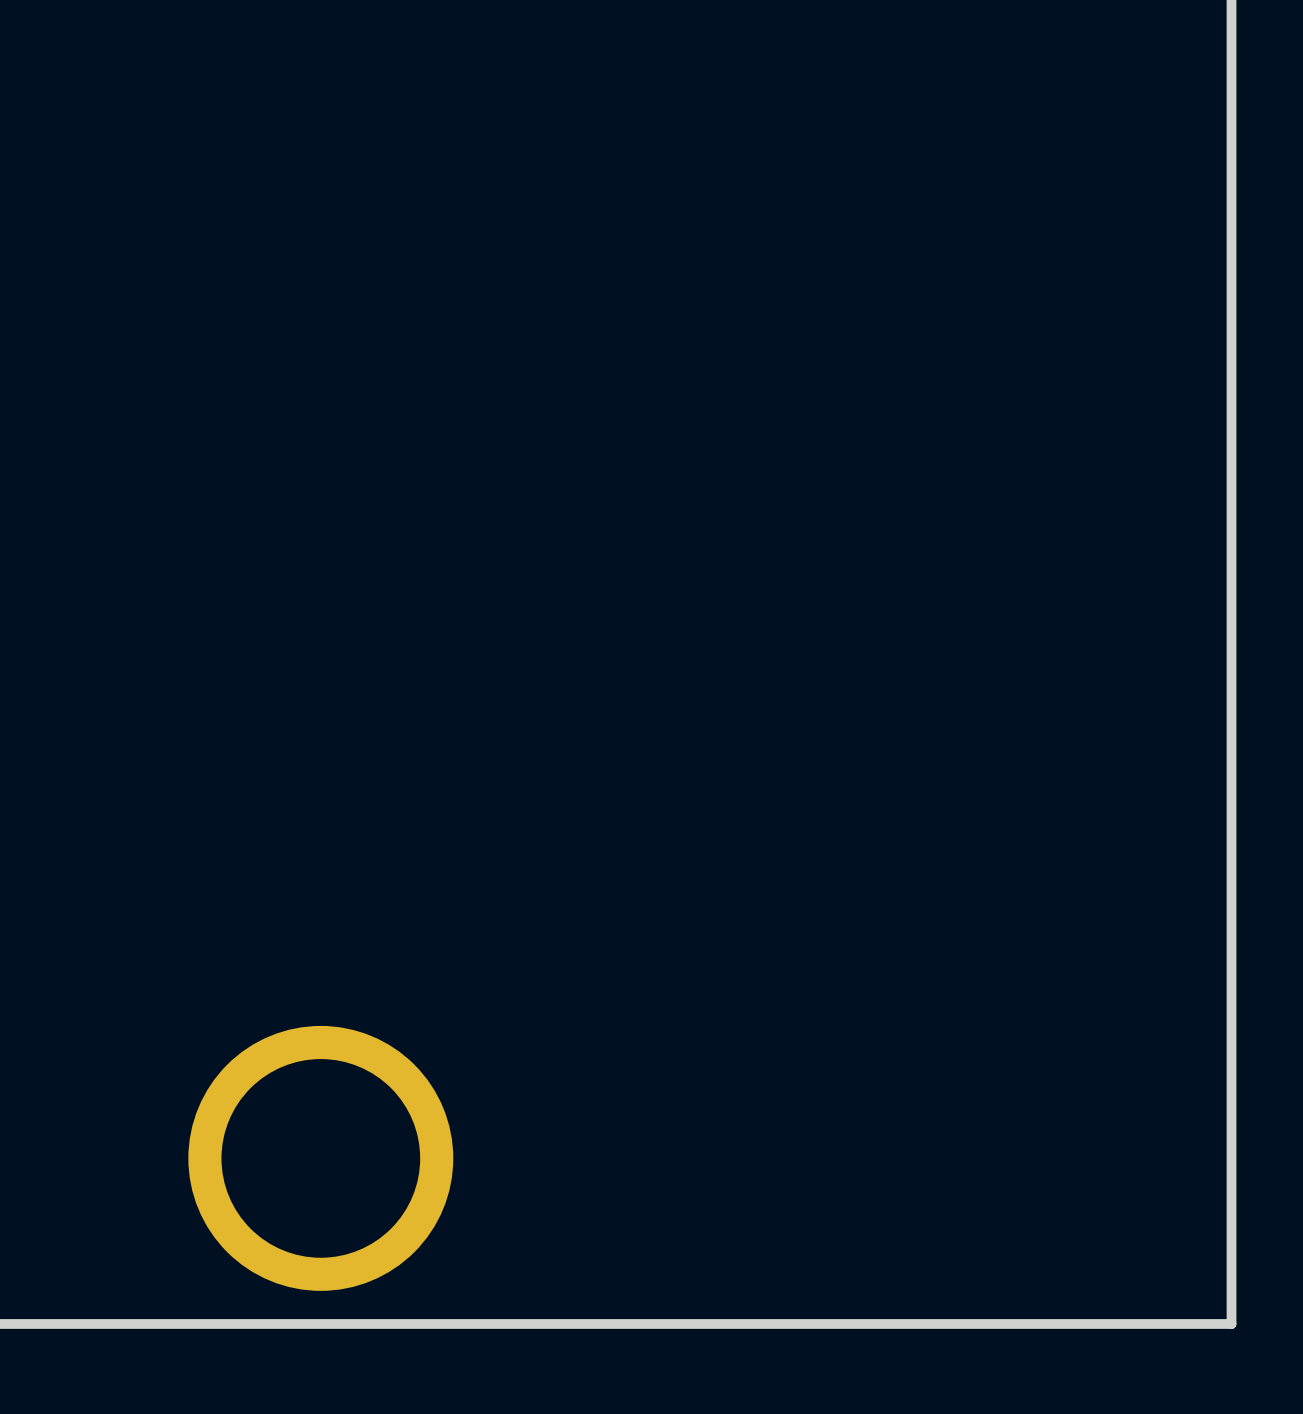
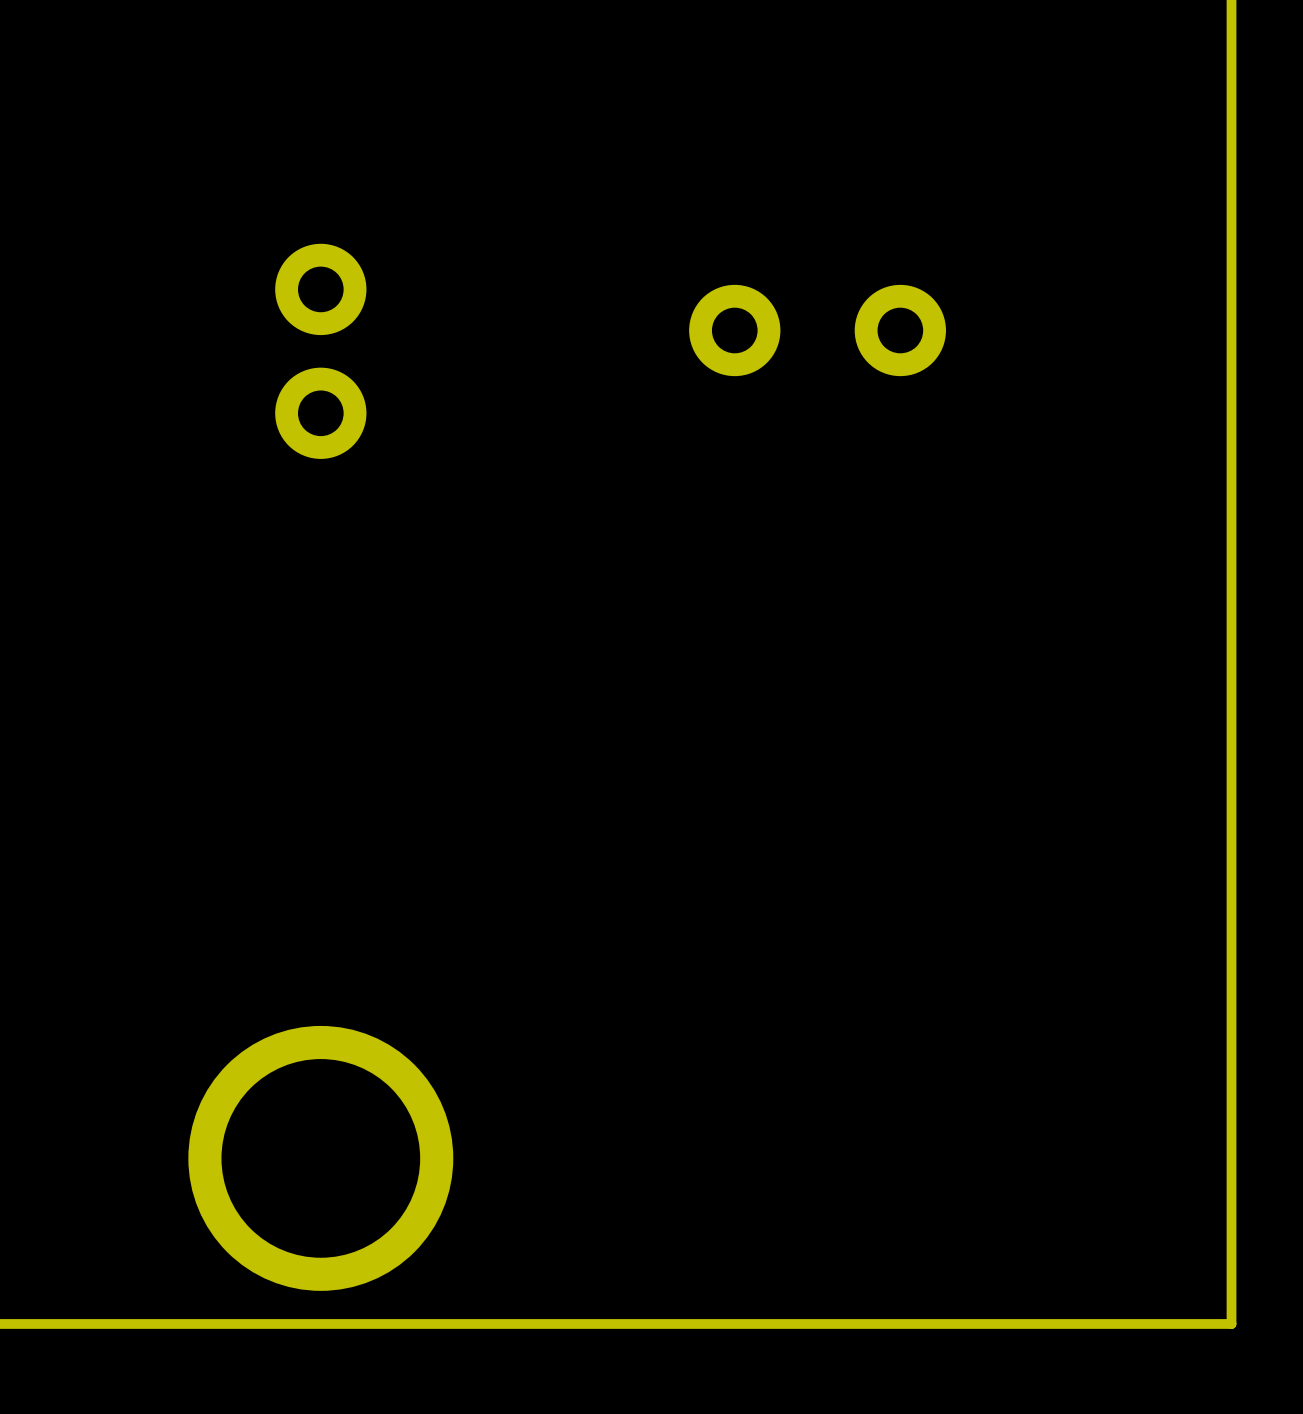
part: none -> (817, 330)
part: none -> (320, 351)

